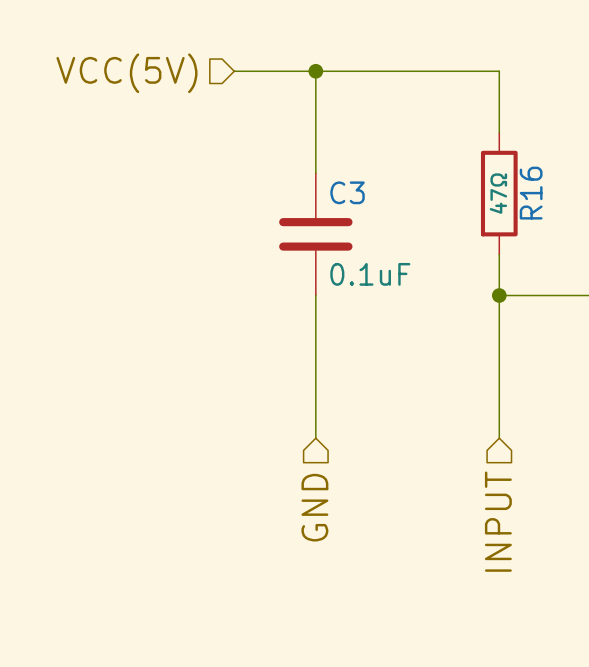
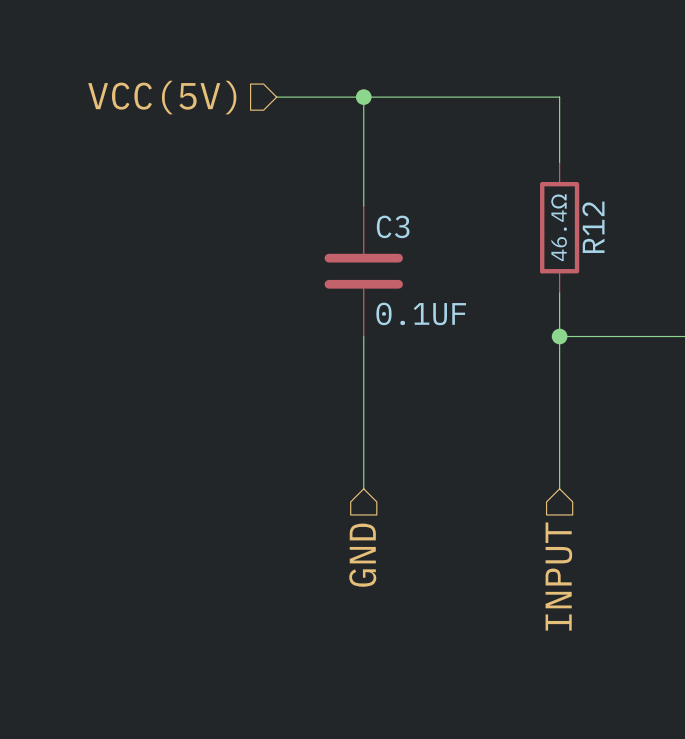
R16 value: 47Ω (498, 193) -> 46.4Ω (559, 227)
R16 name: R16 (531, 193) -> R12 (593, 227)
C3 value: 0.1uF (370, 274) -> 0.1UF (421, 313)

